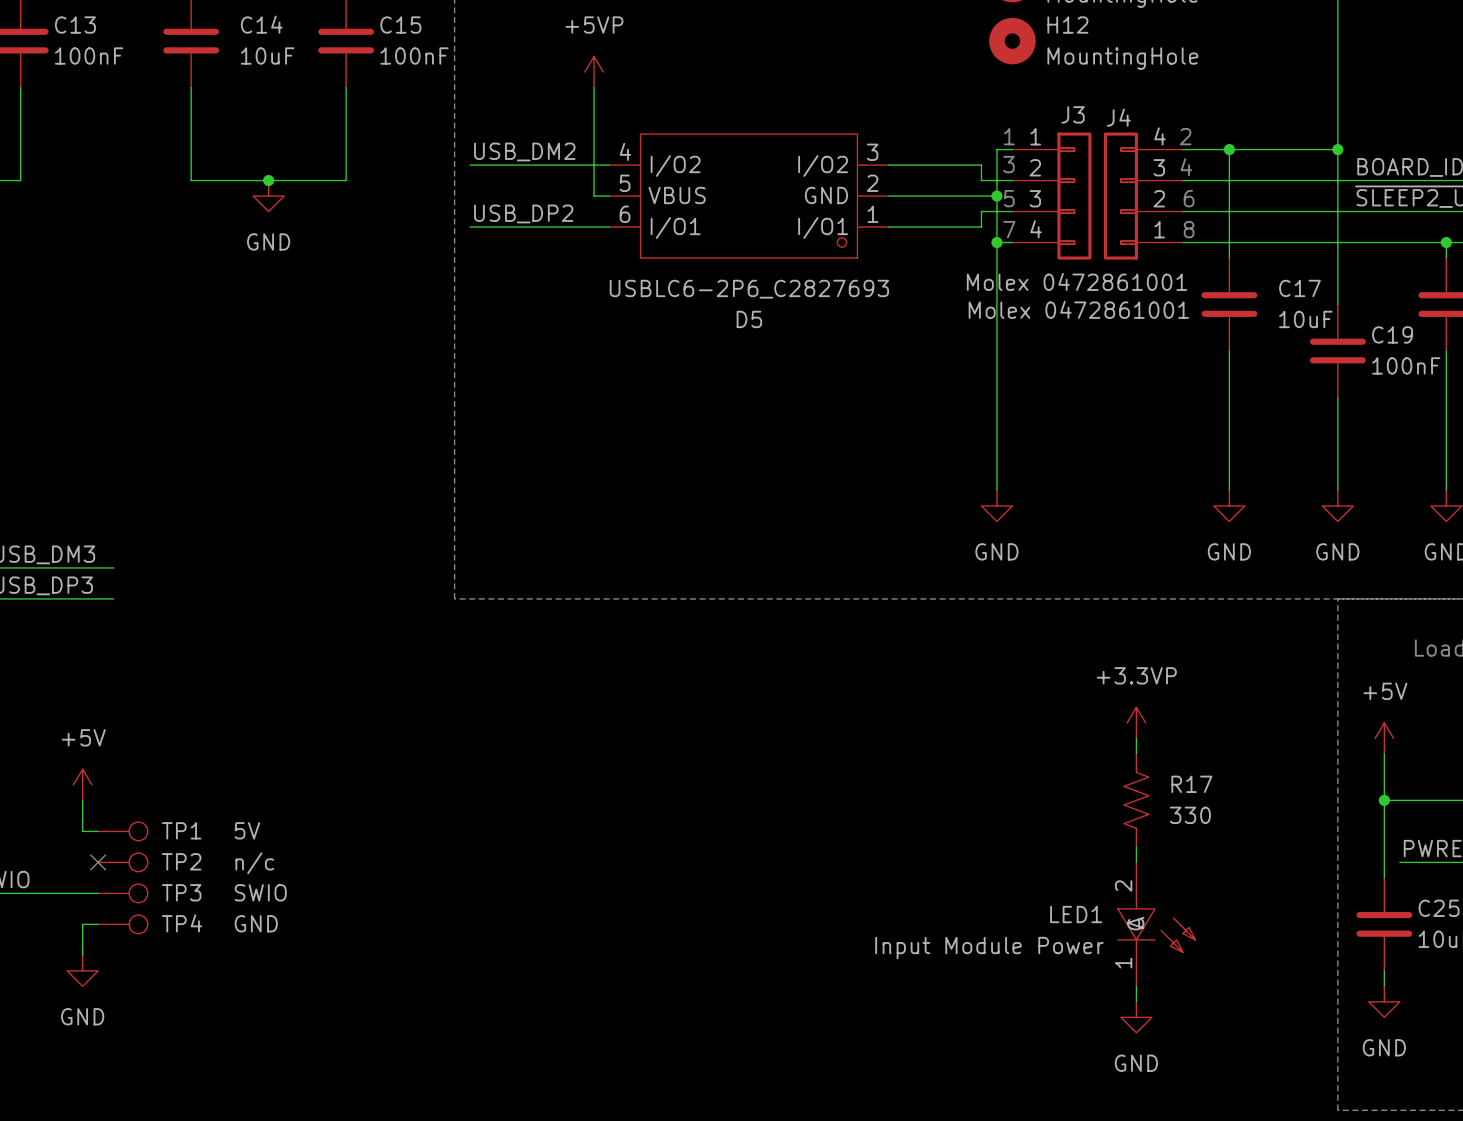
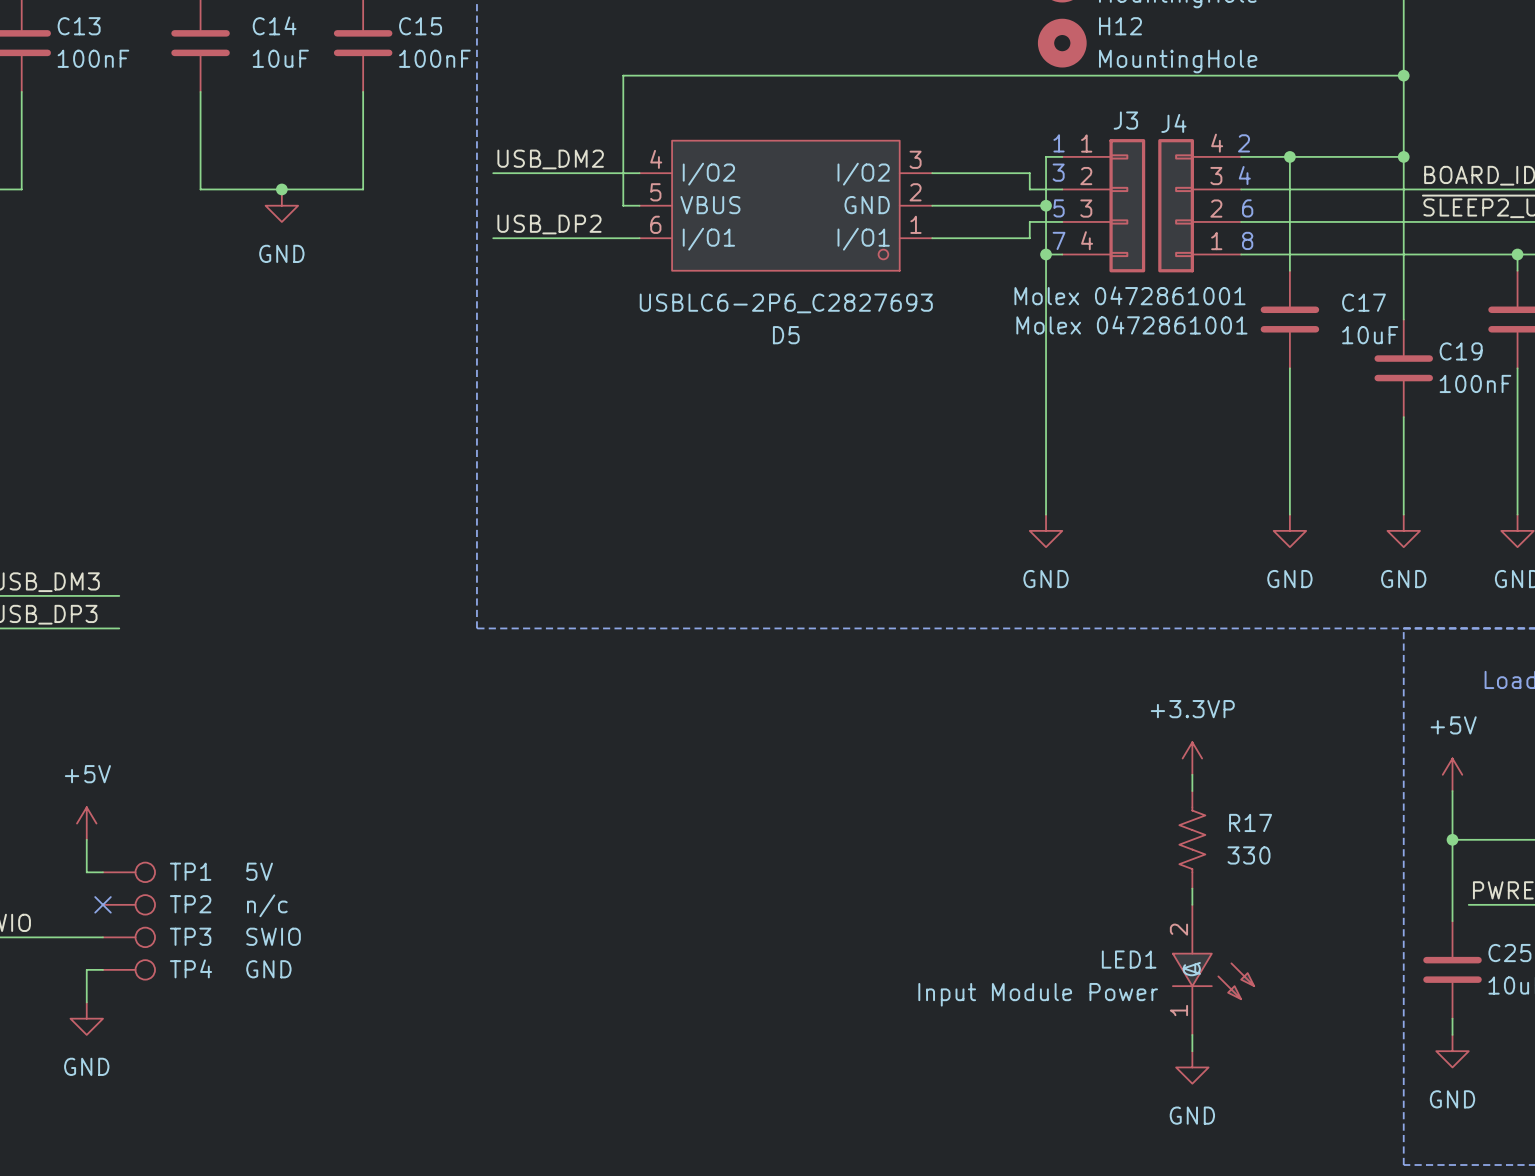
power symbol: +5VP (594, 72) -> none
wire: none -> (1403, 75) (623, 75) (623, 91)
junction: none -> (1403, 75)

